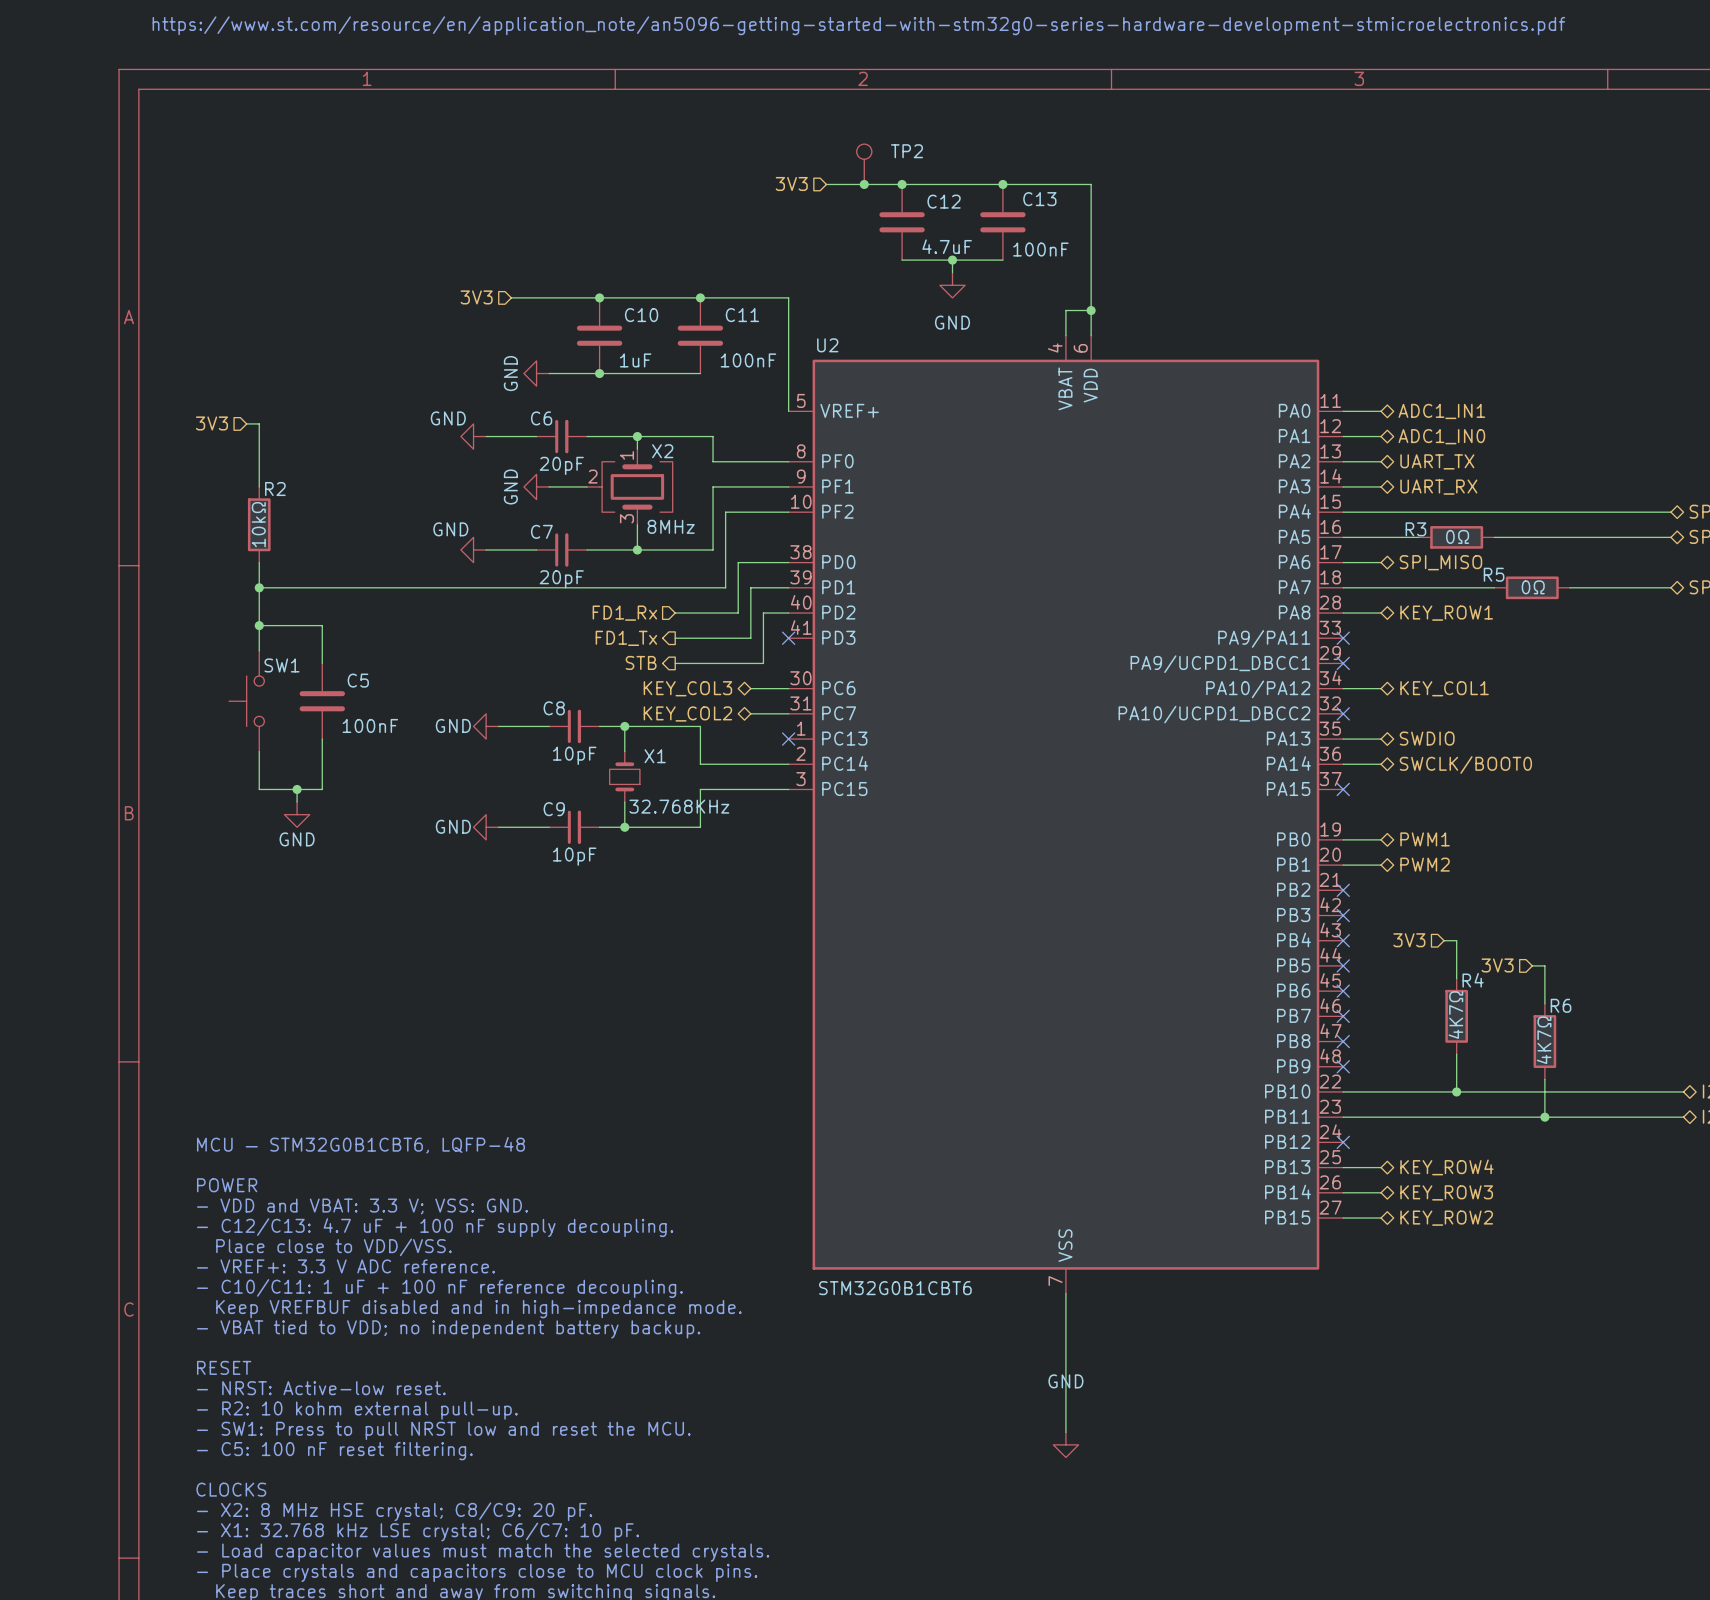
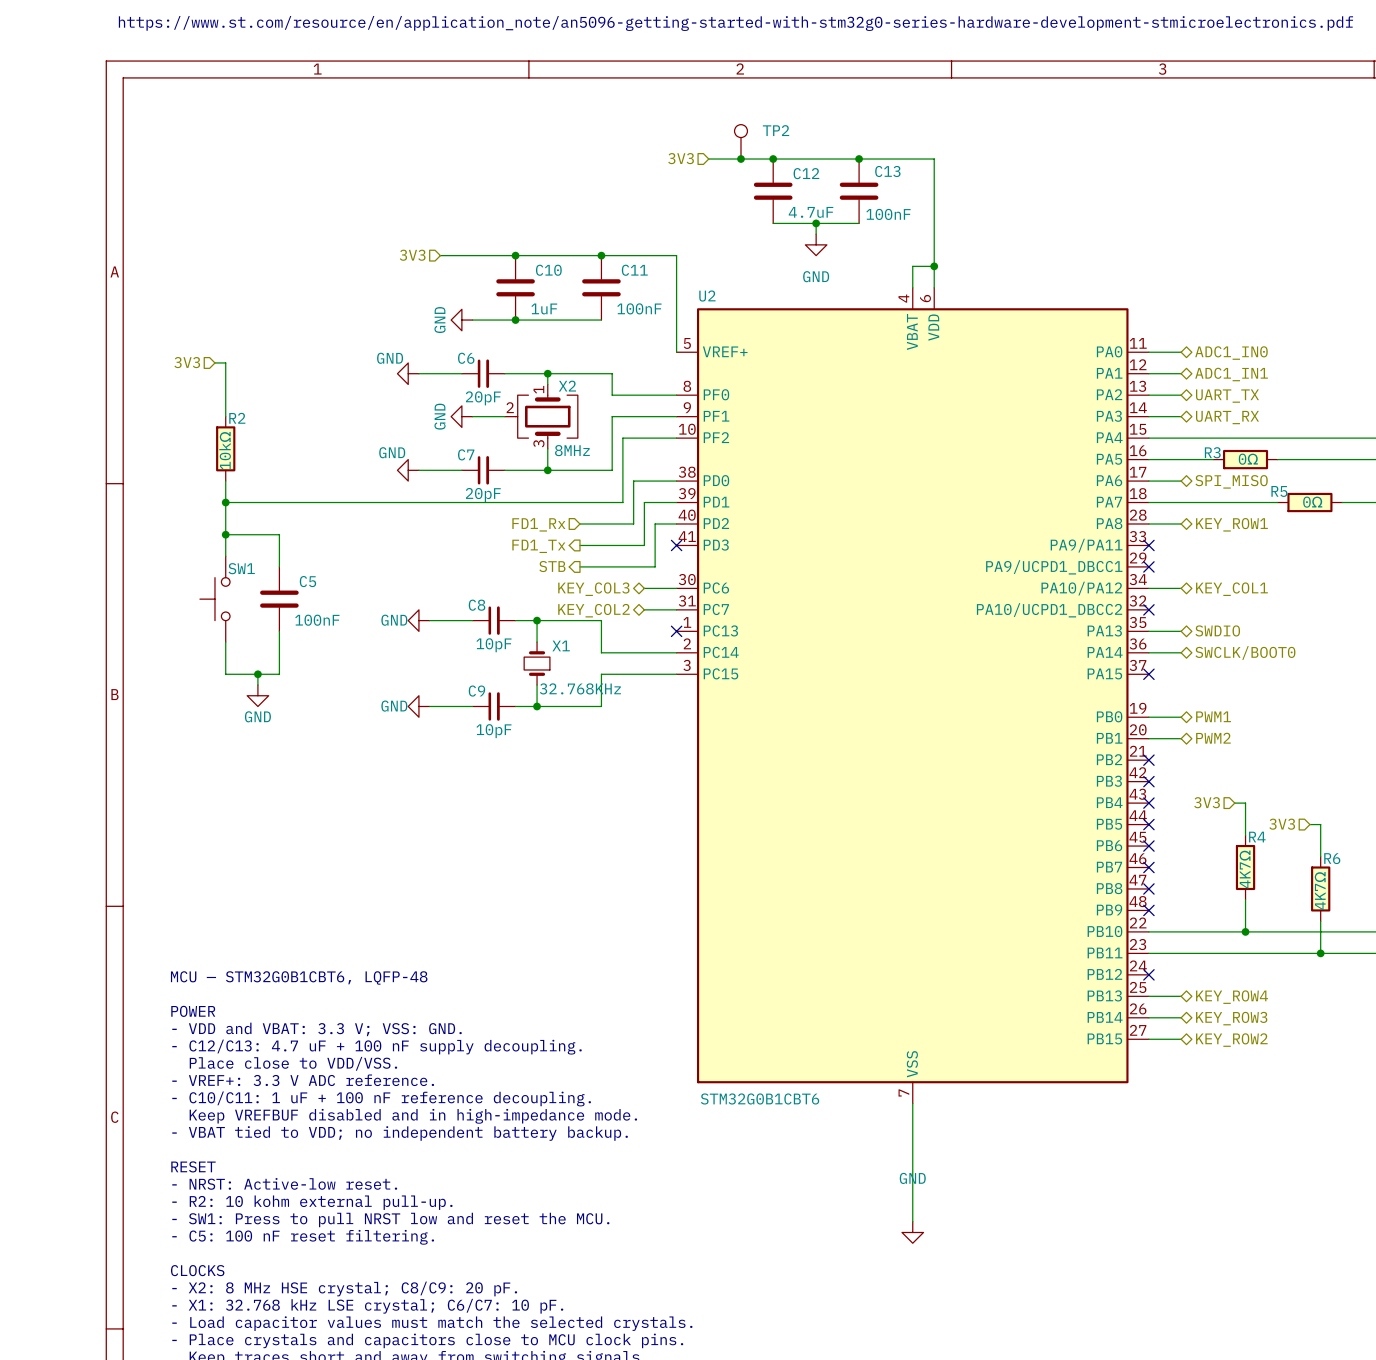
hierarchical label: ADC1_IN1 (1441, 411) -> ADC1_IN0 (1231, 353)
hierarchical label: ADC1_IN0 (1441, 436) -> ADC1_IN1 (1231, 374)

